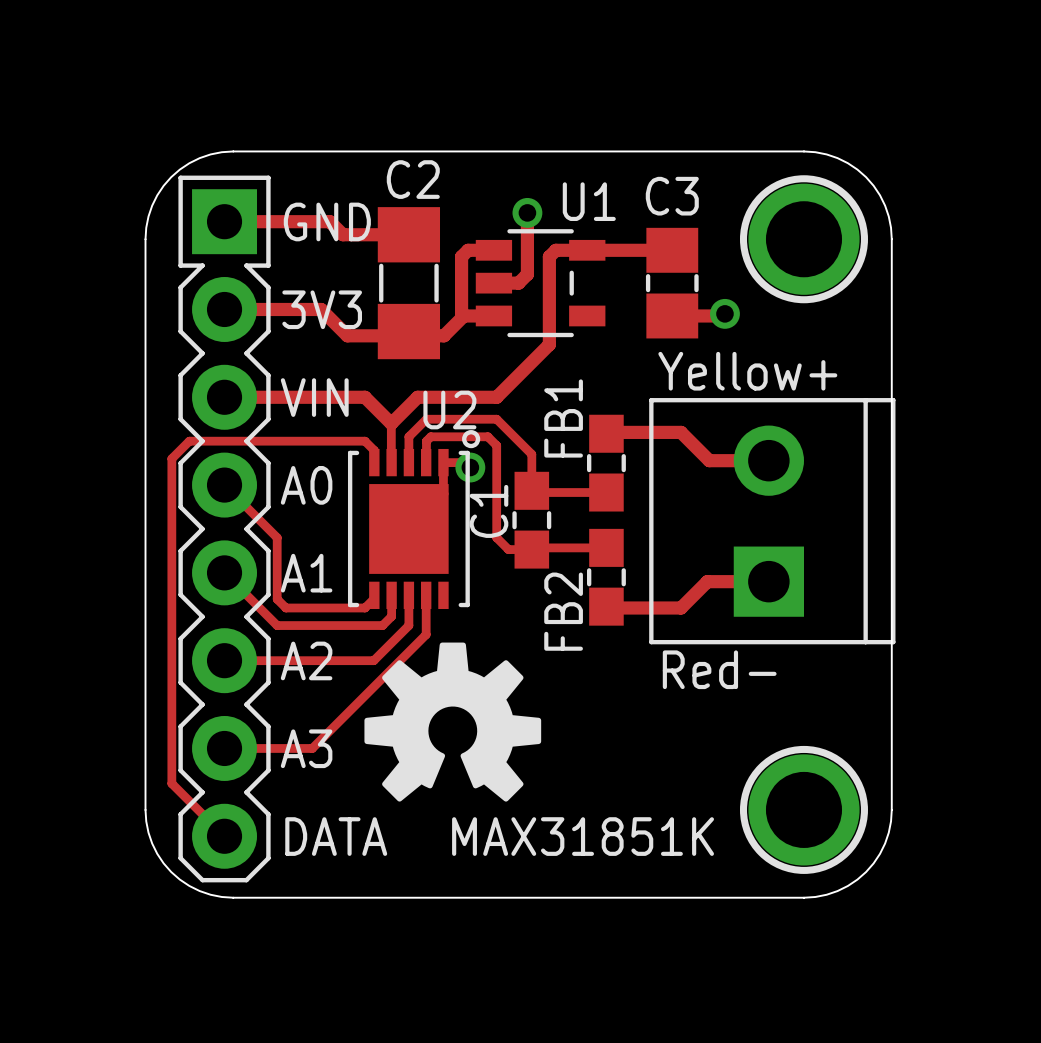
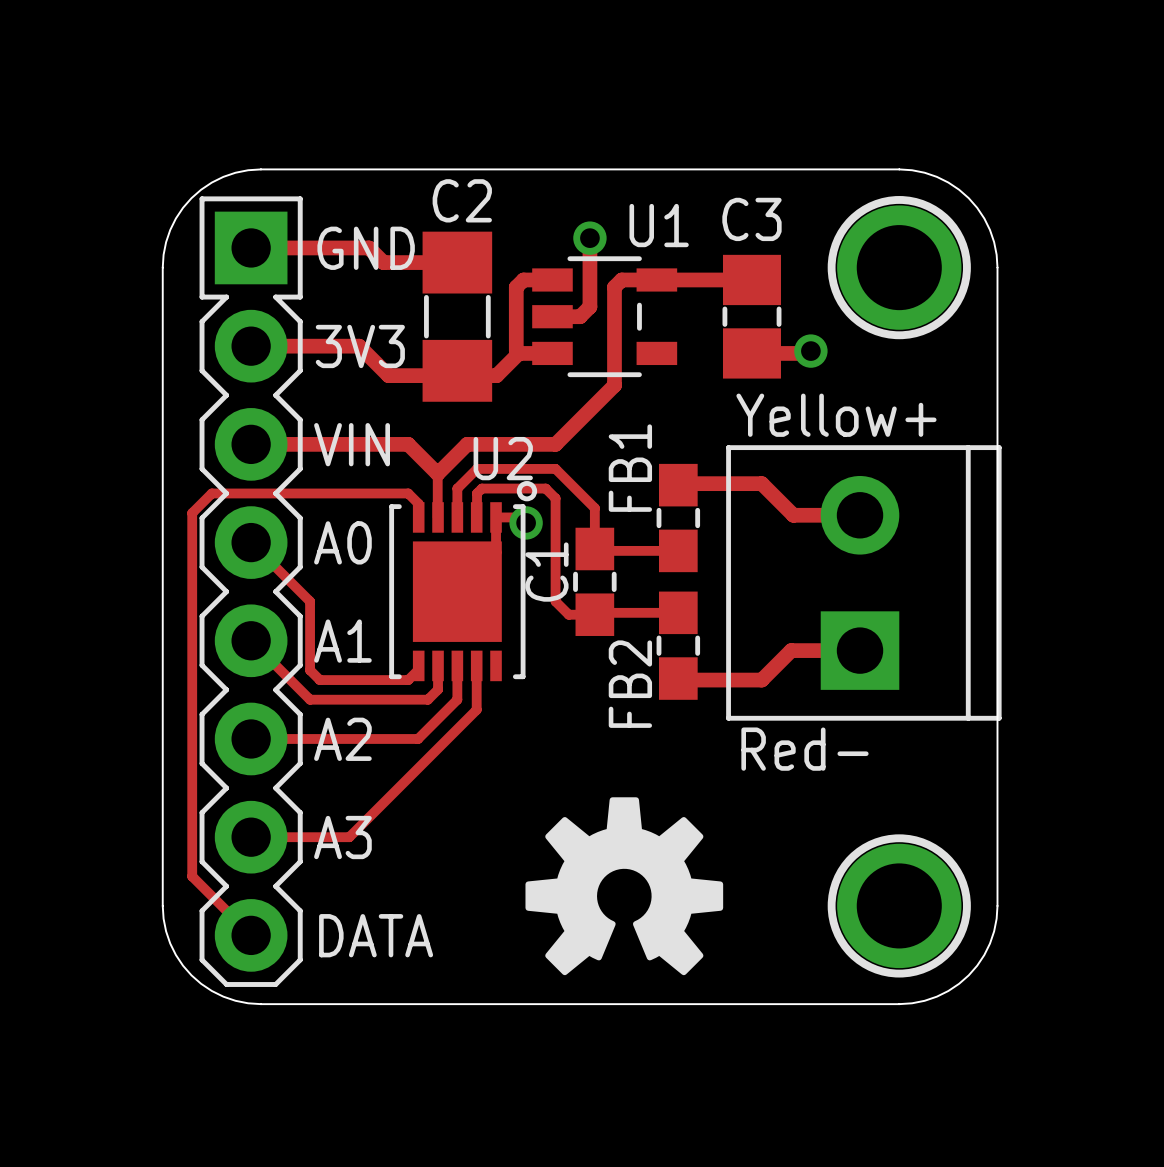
drawing position: (452, 722) -> (624, 886)
text: MAX31851K (583, 836) -> none

